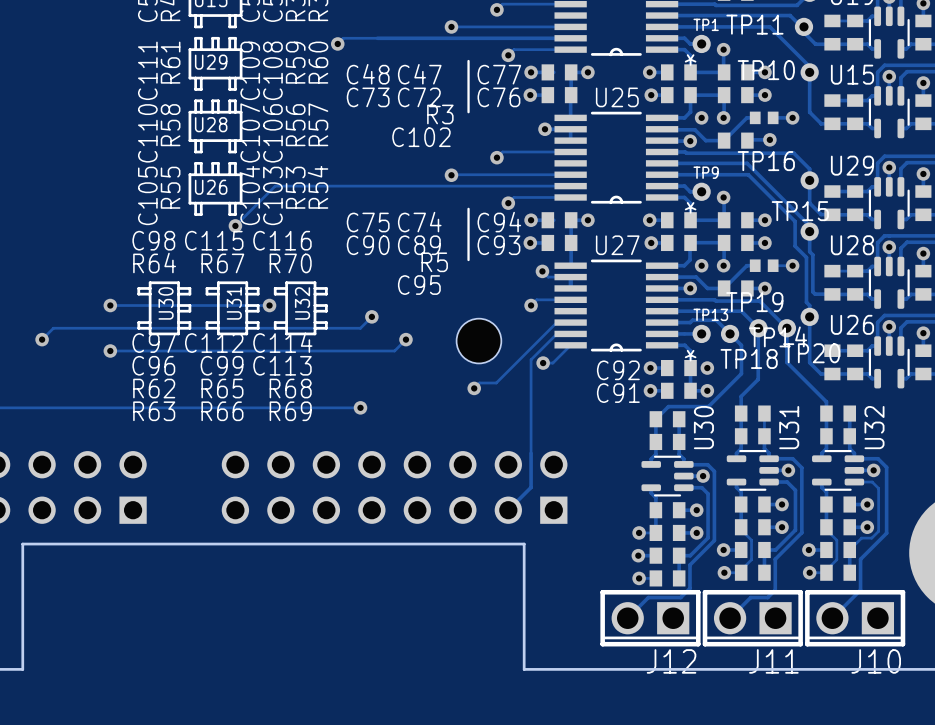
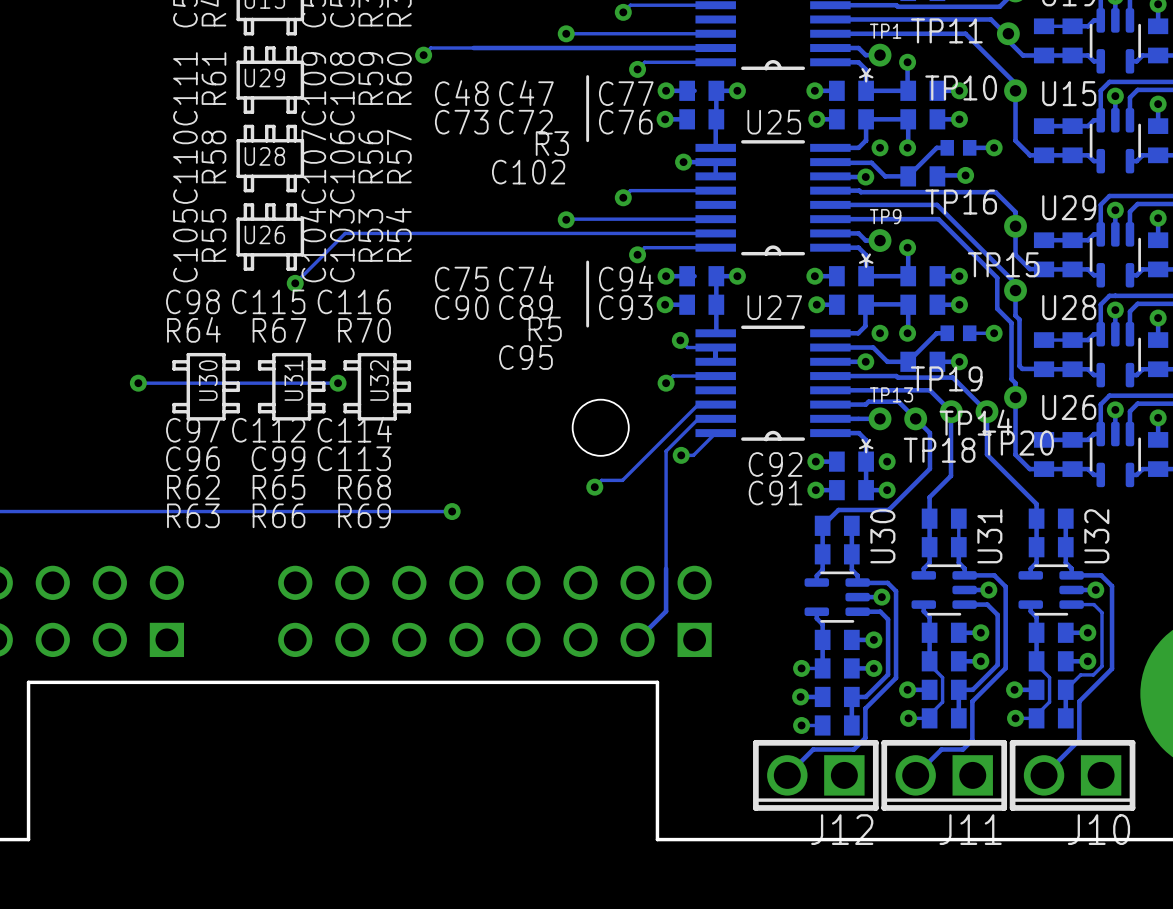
track: (371, 316) (360, 328) (53, 328) (42, 339) -> none
via: (371, 316) -> none
via: (42, 339) -> none
track: (405, 339) (394, 351) (110, 351) -> none
via: (405, 339) -> none
via: (110, 351) -> none

